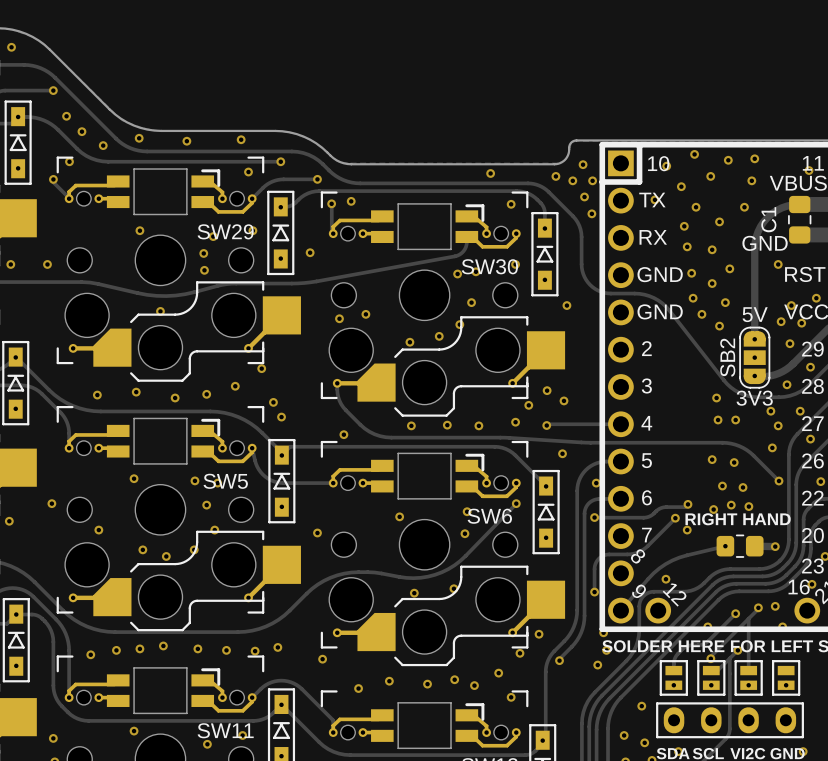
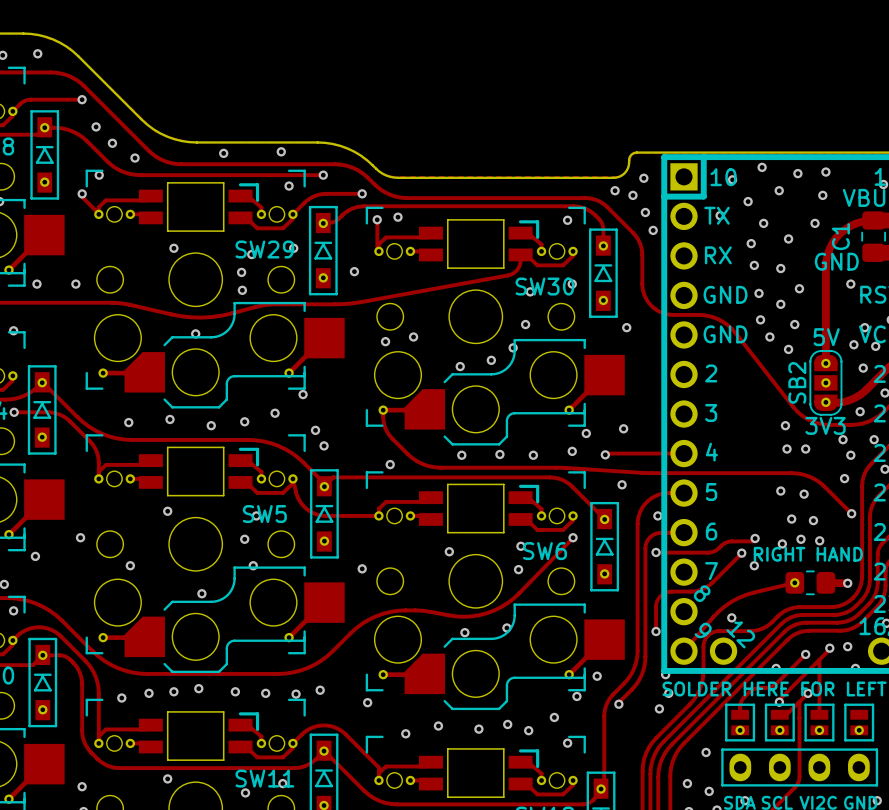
via: (139, 138) -> none
via: (490, 173) -> none
via: (592, 180) -> none
via: (457, 274) -> none
via: (547, 390) -> none
via: (194, 480) -> none
via: (142, 549) -> none
via: (194, 549) -> none

